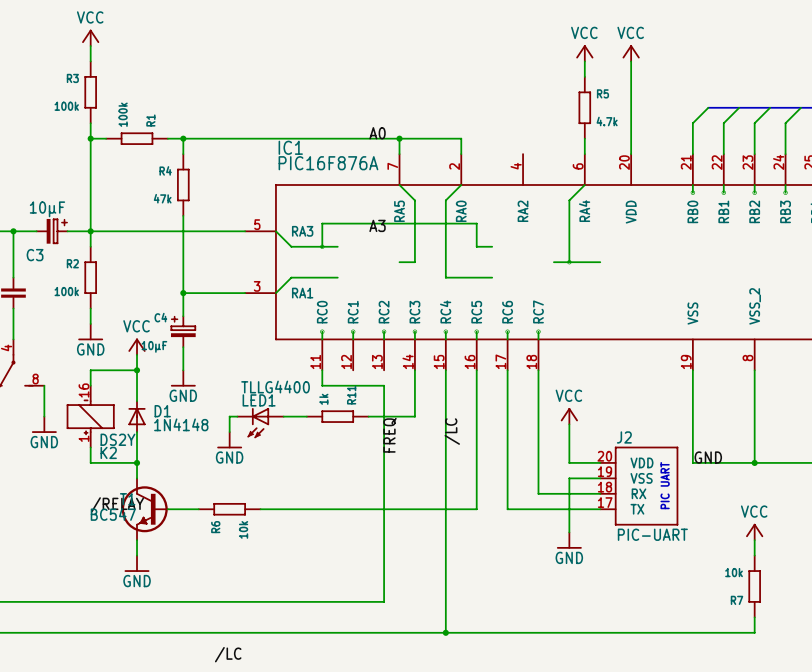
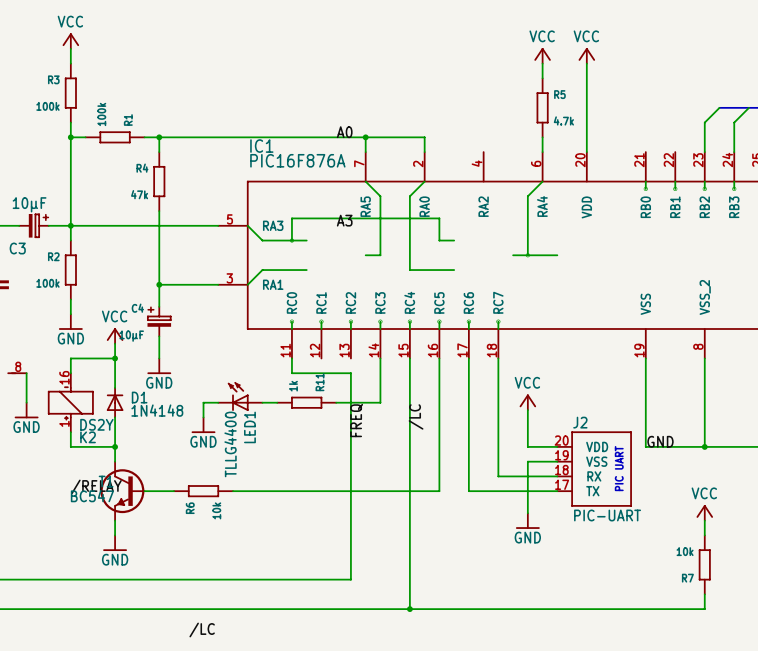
bus: (708, 107) (770, 107) -> none
wire: (708, 107) (692, 123) (692, 154) -> none
wire: (739, 107) (723, 123) (723, 154) -> none
LED1 value position: TLLG4400 (275, 387) -> TLLG4400 (230, 444)
LED1 name position: LED1 (259, 400) -> LED1 (249, 427)
LED1 flip: as is (258, 423) -> up-down (238, 396)

